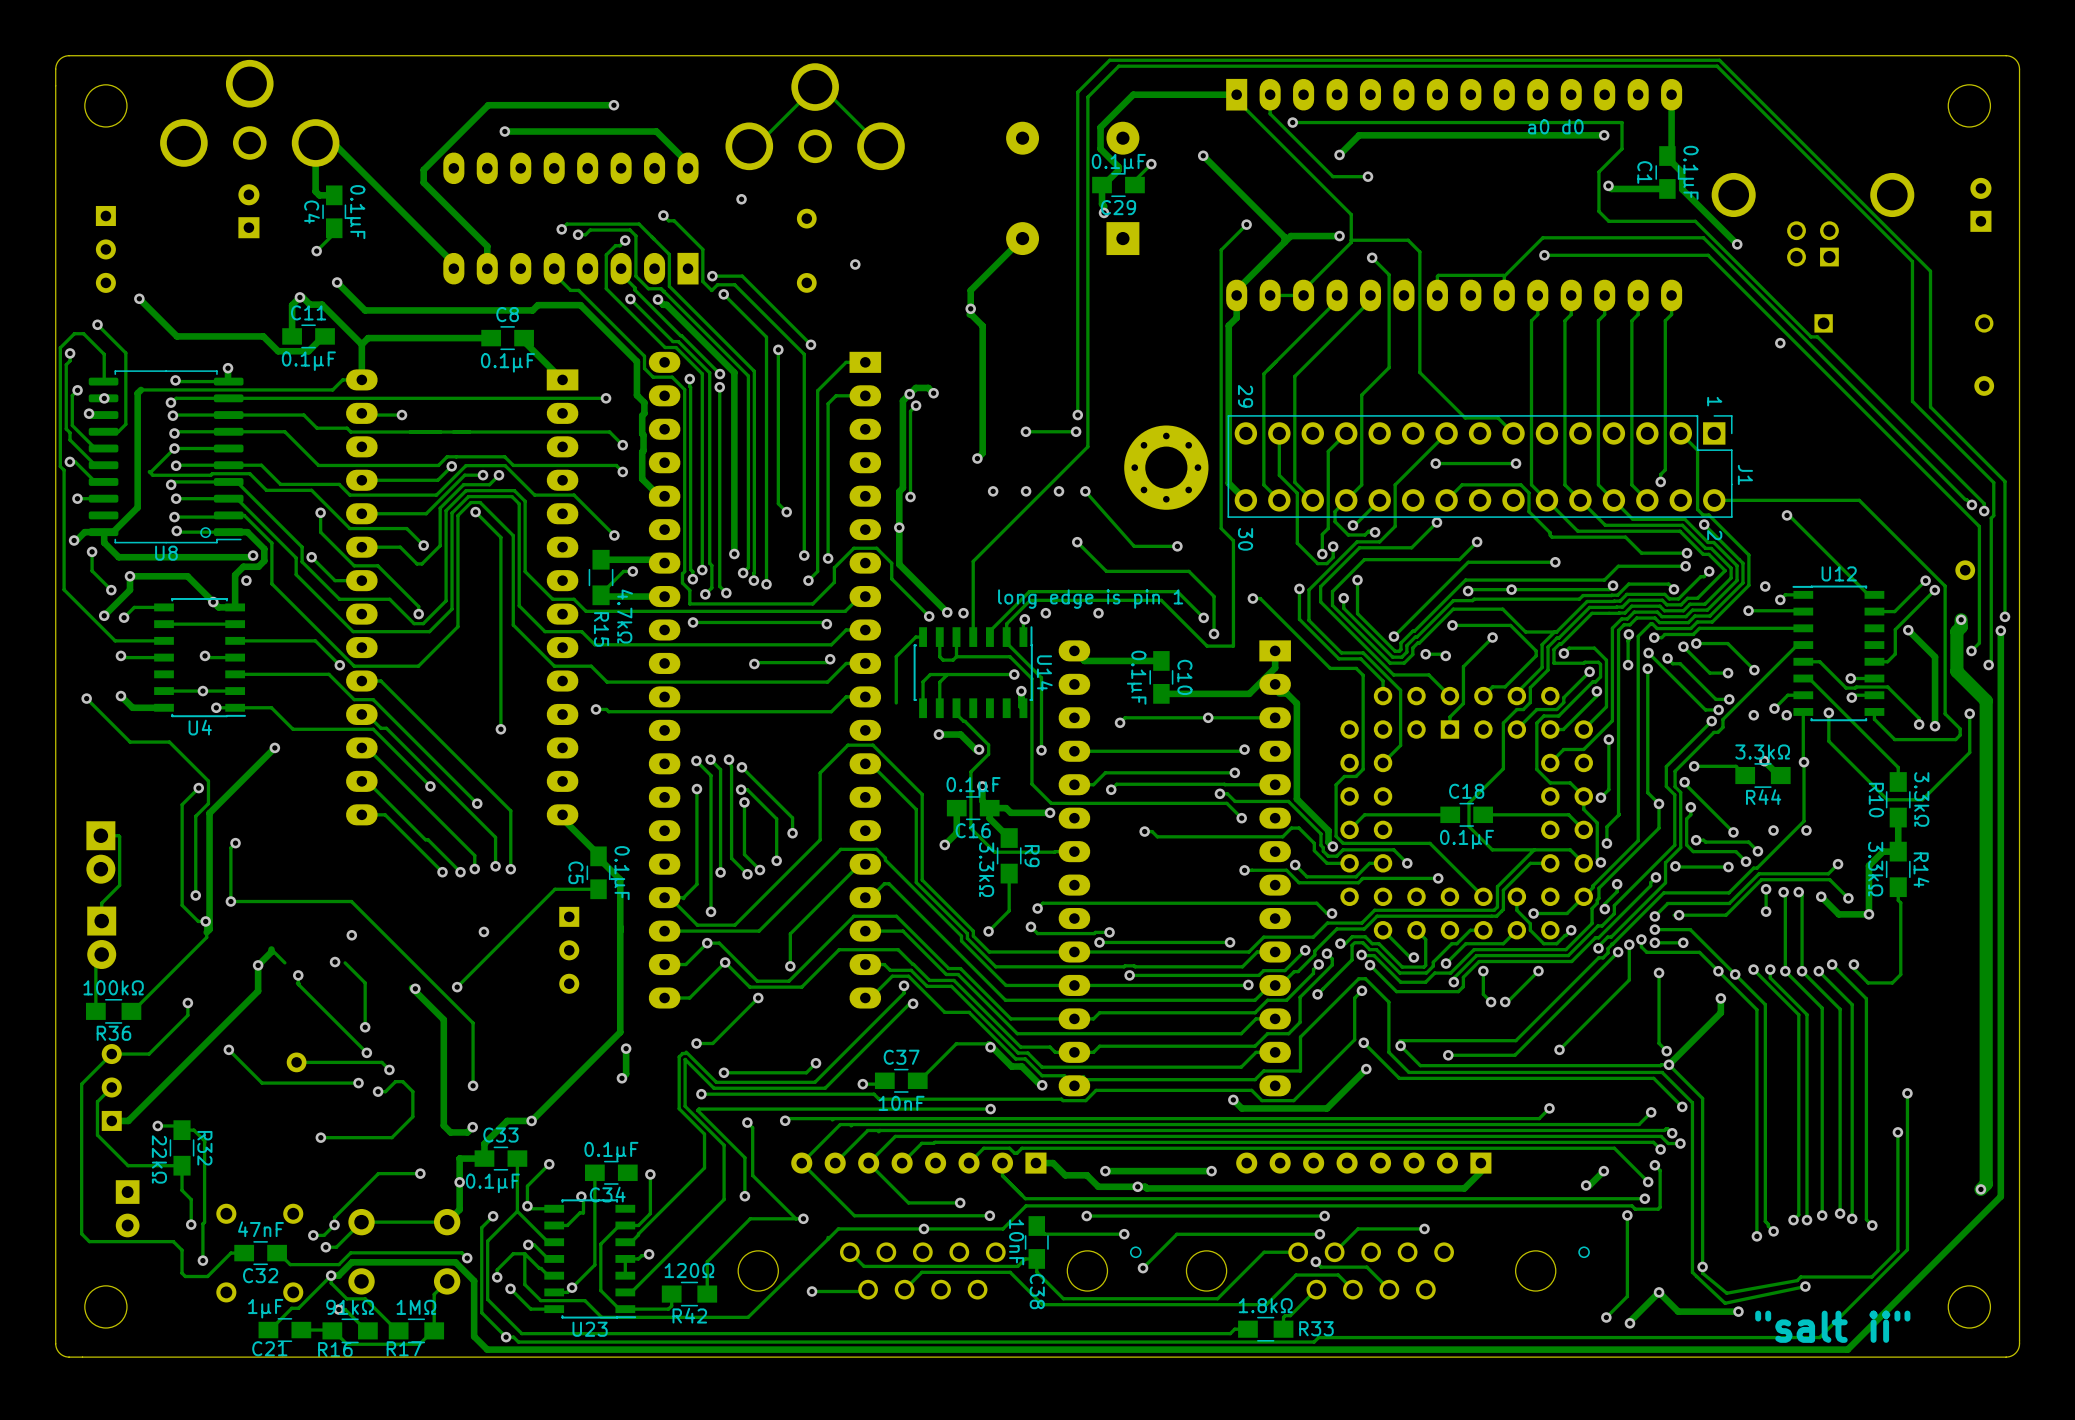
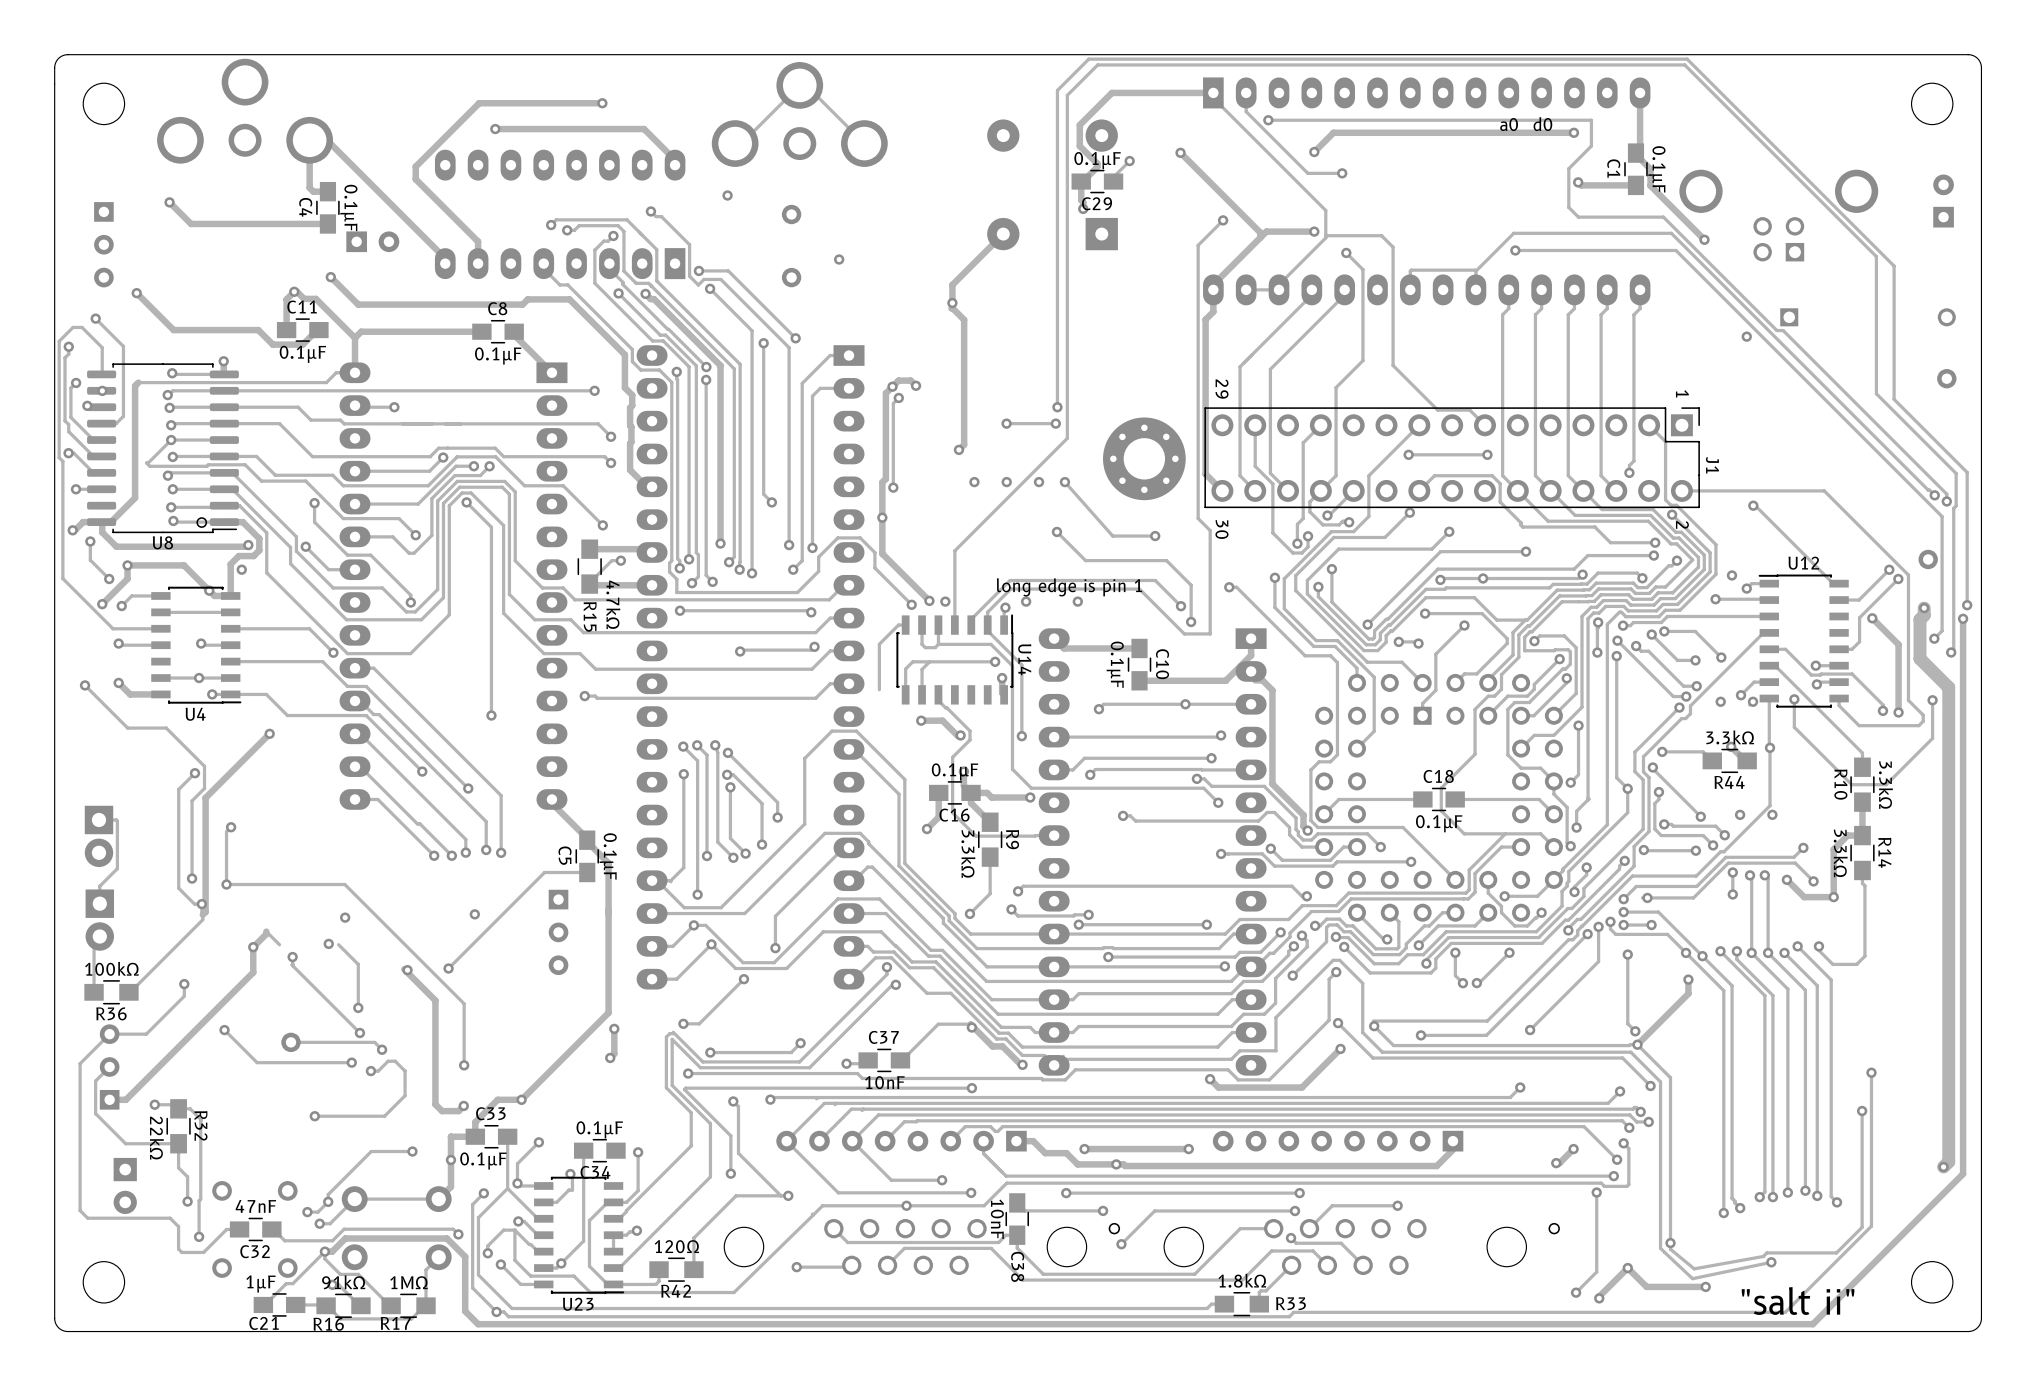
track: none -> (169, 202) (191, 223) (327, 223)
via: none -> (169, 202)
part rotation: 0° (248, 211) -> 90° clockwise (372, 241)
part position: (248, 211) -> (372, 241)
track: (334, 233) (316, 251) -> none
via: (316, 251) -> none

